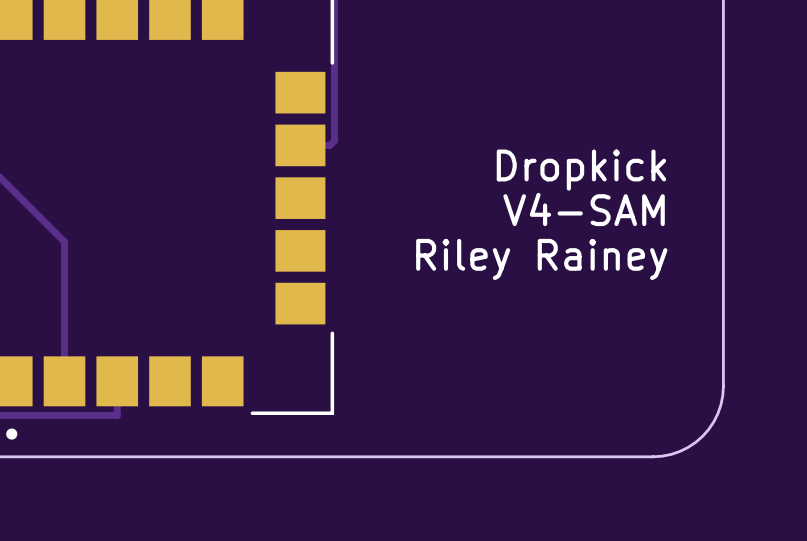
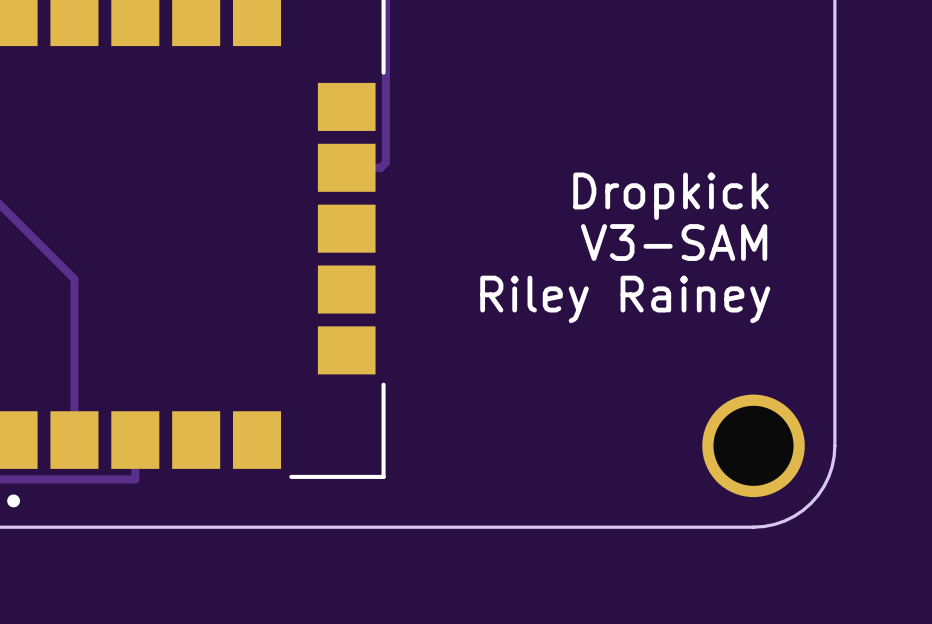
text: V4-SAM (584, 209) -> V3-SAM (674, 242)
part: none -> (753, 445)

